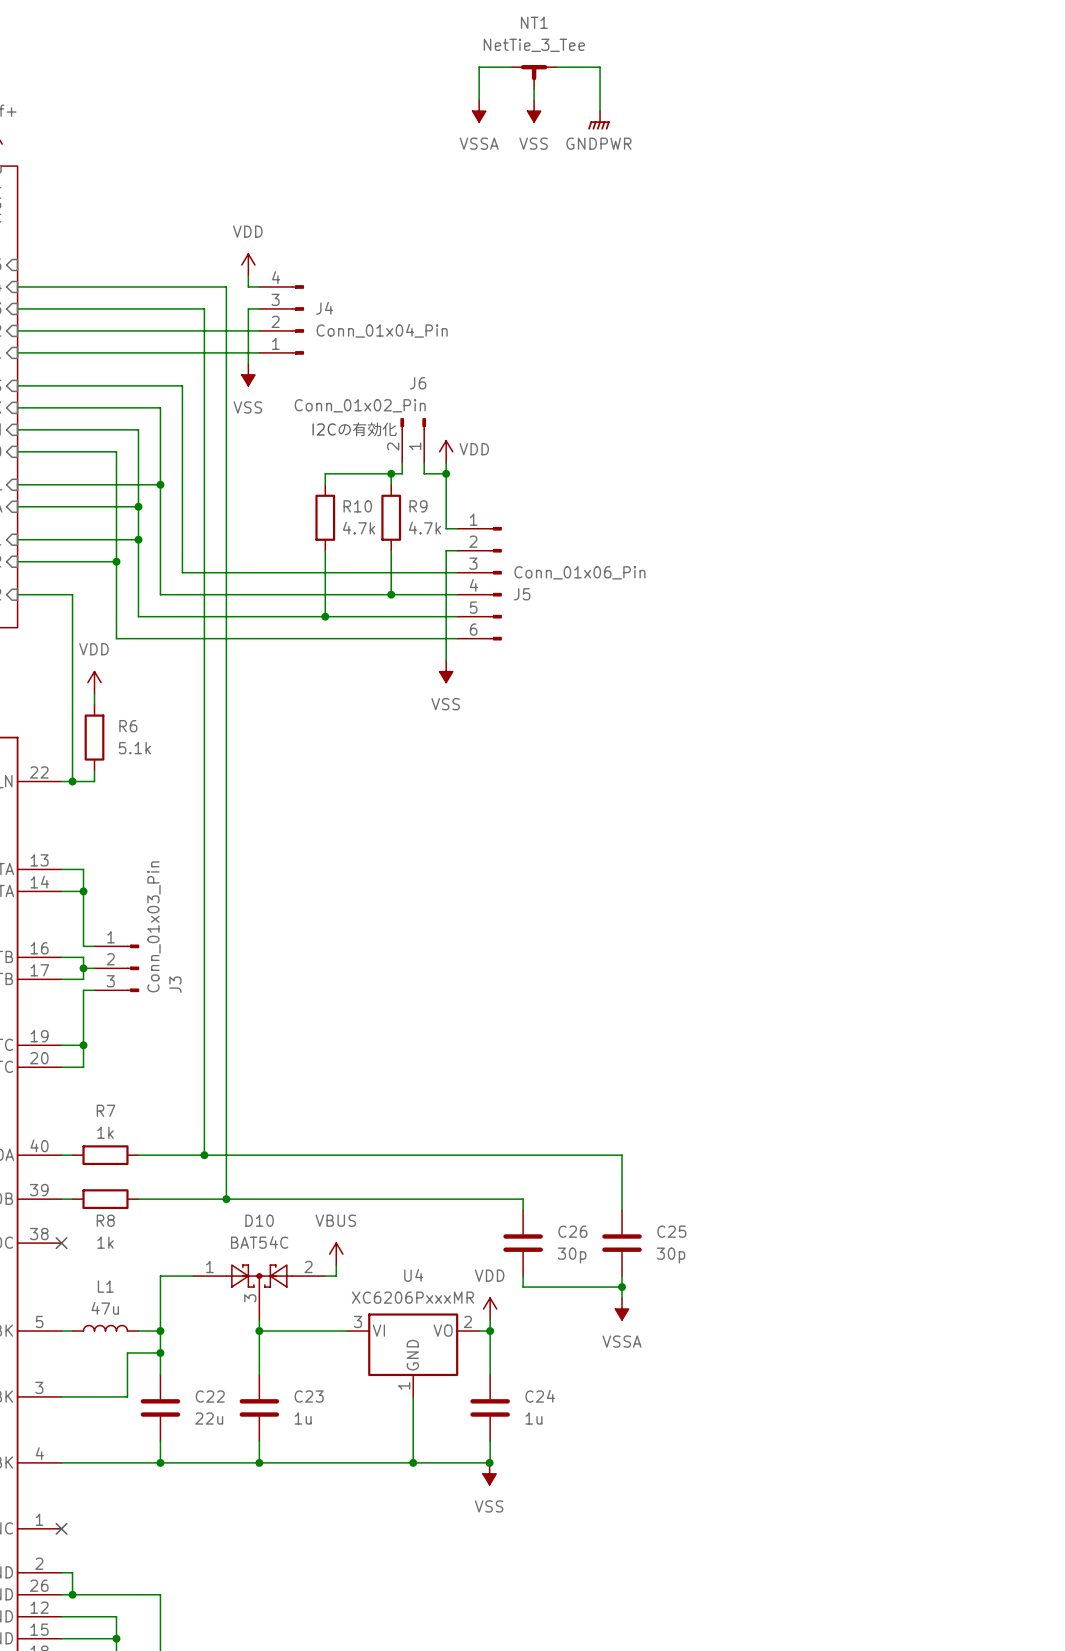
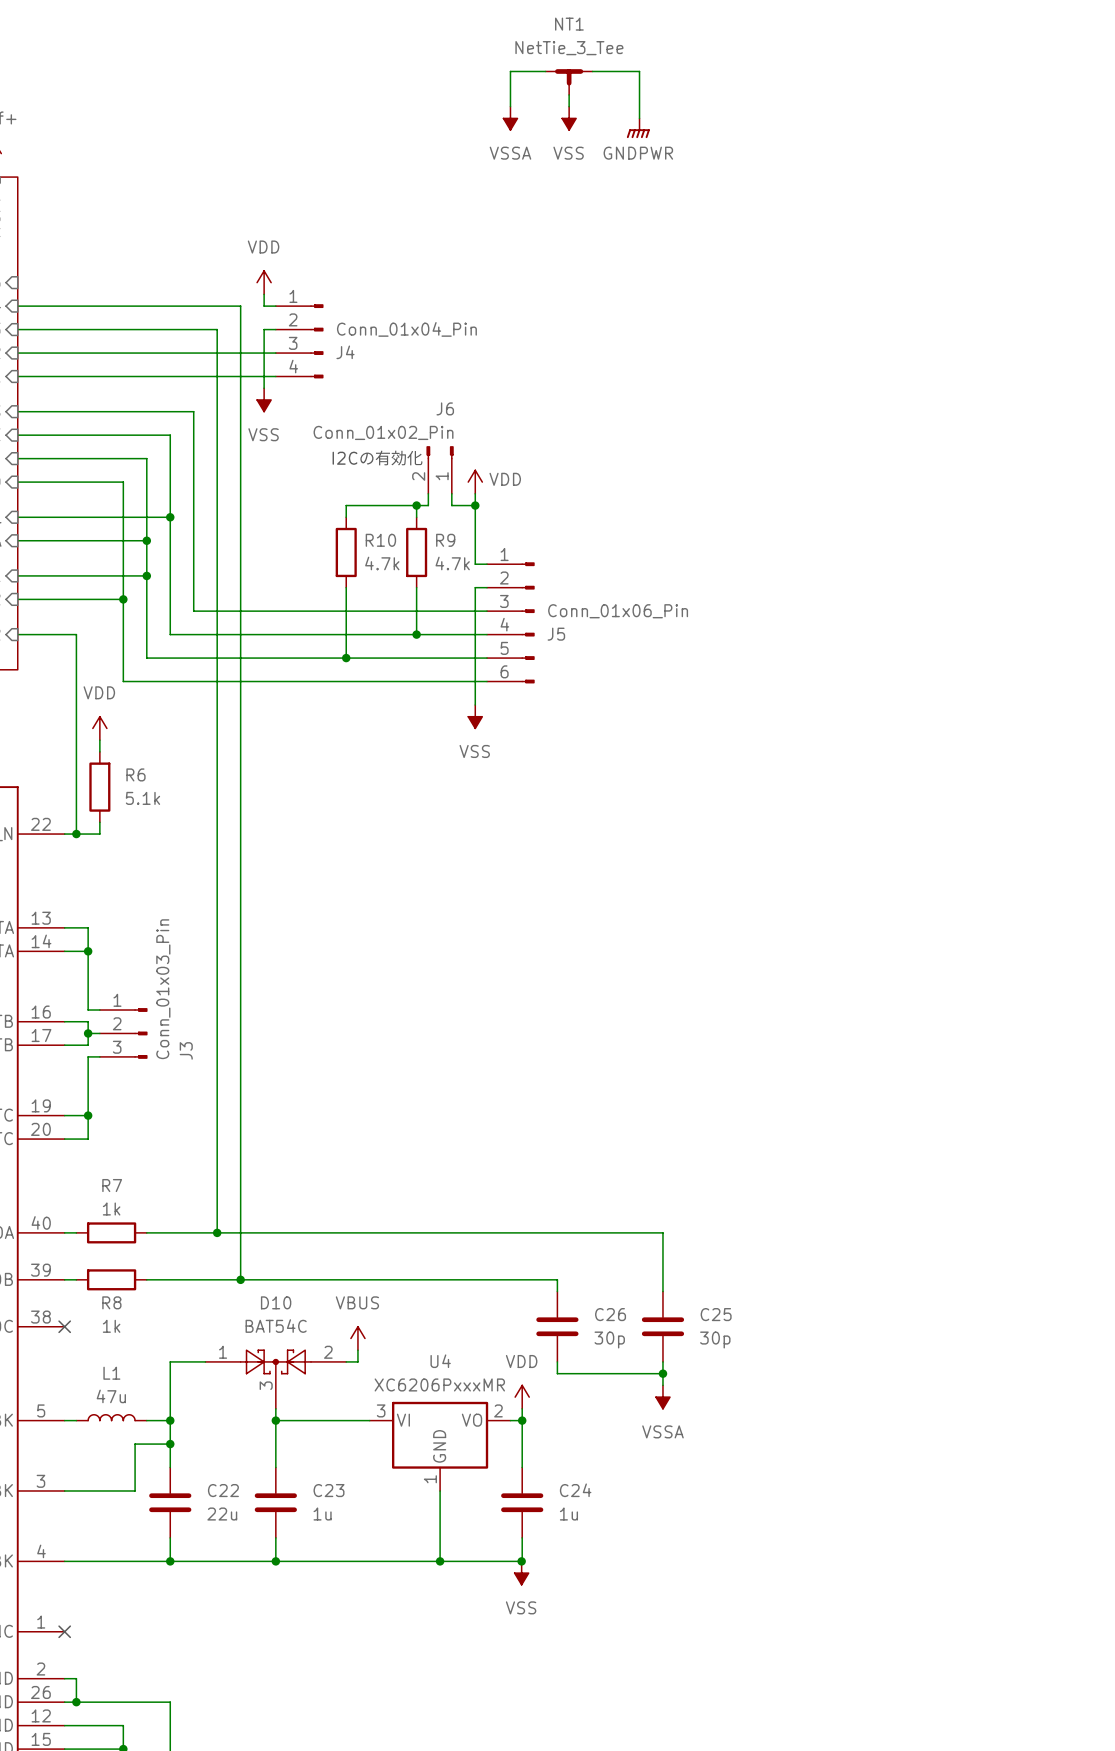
J4 flip: as is (297, 319) -> up-down (316, 341)

